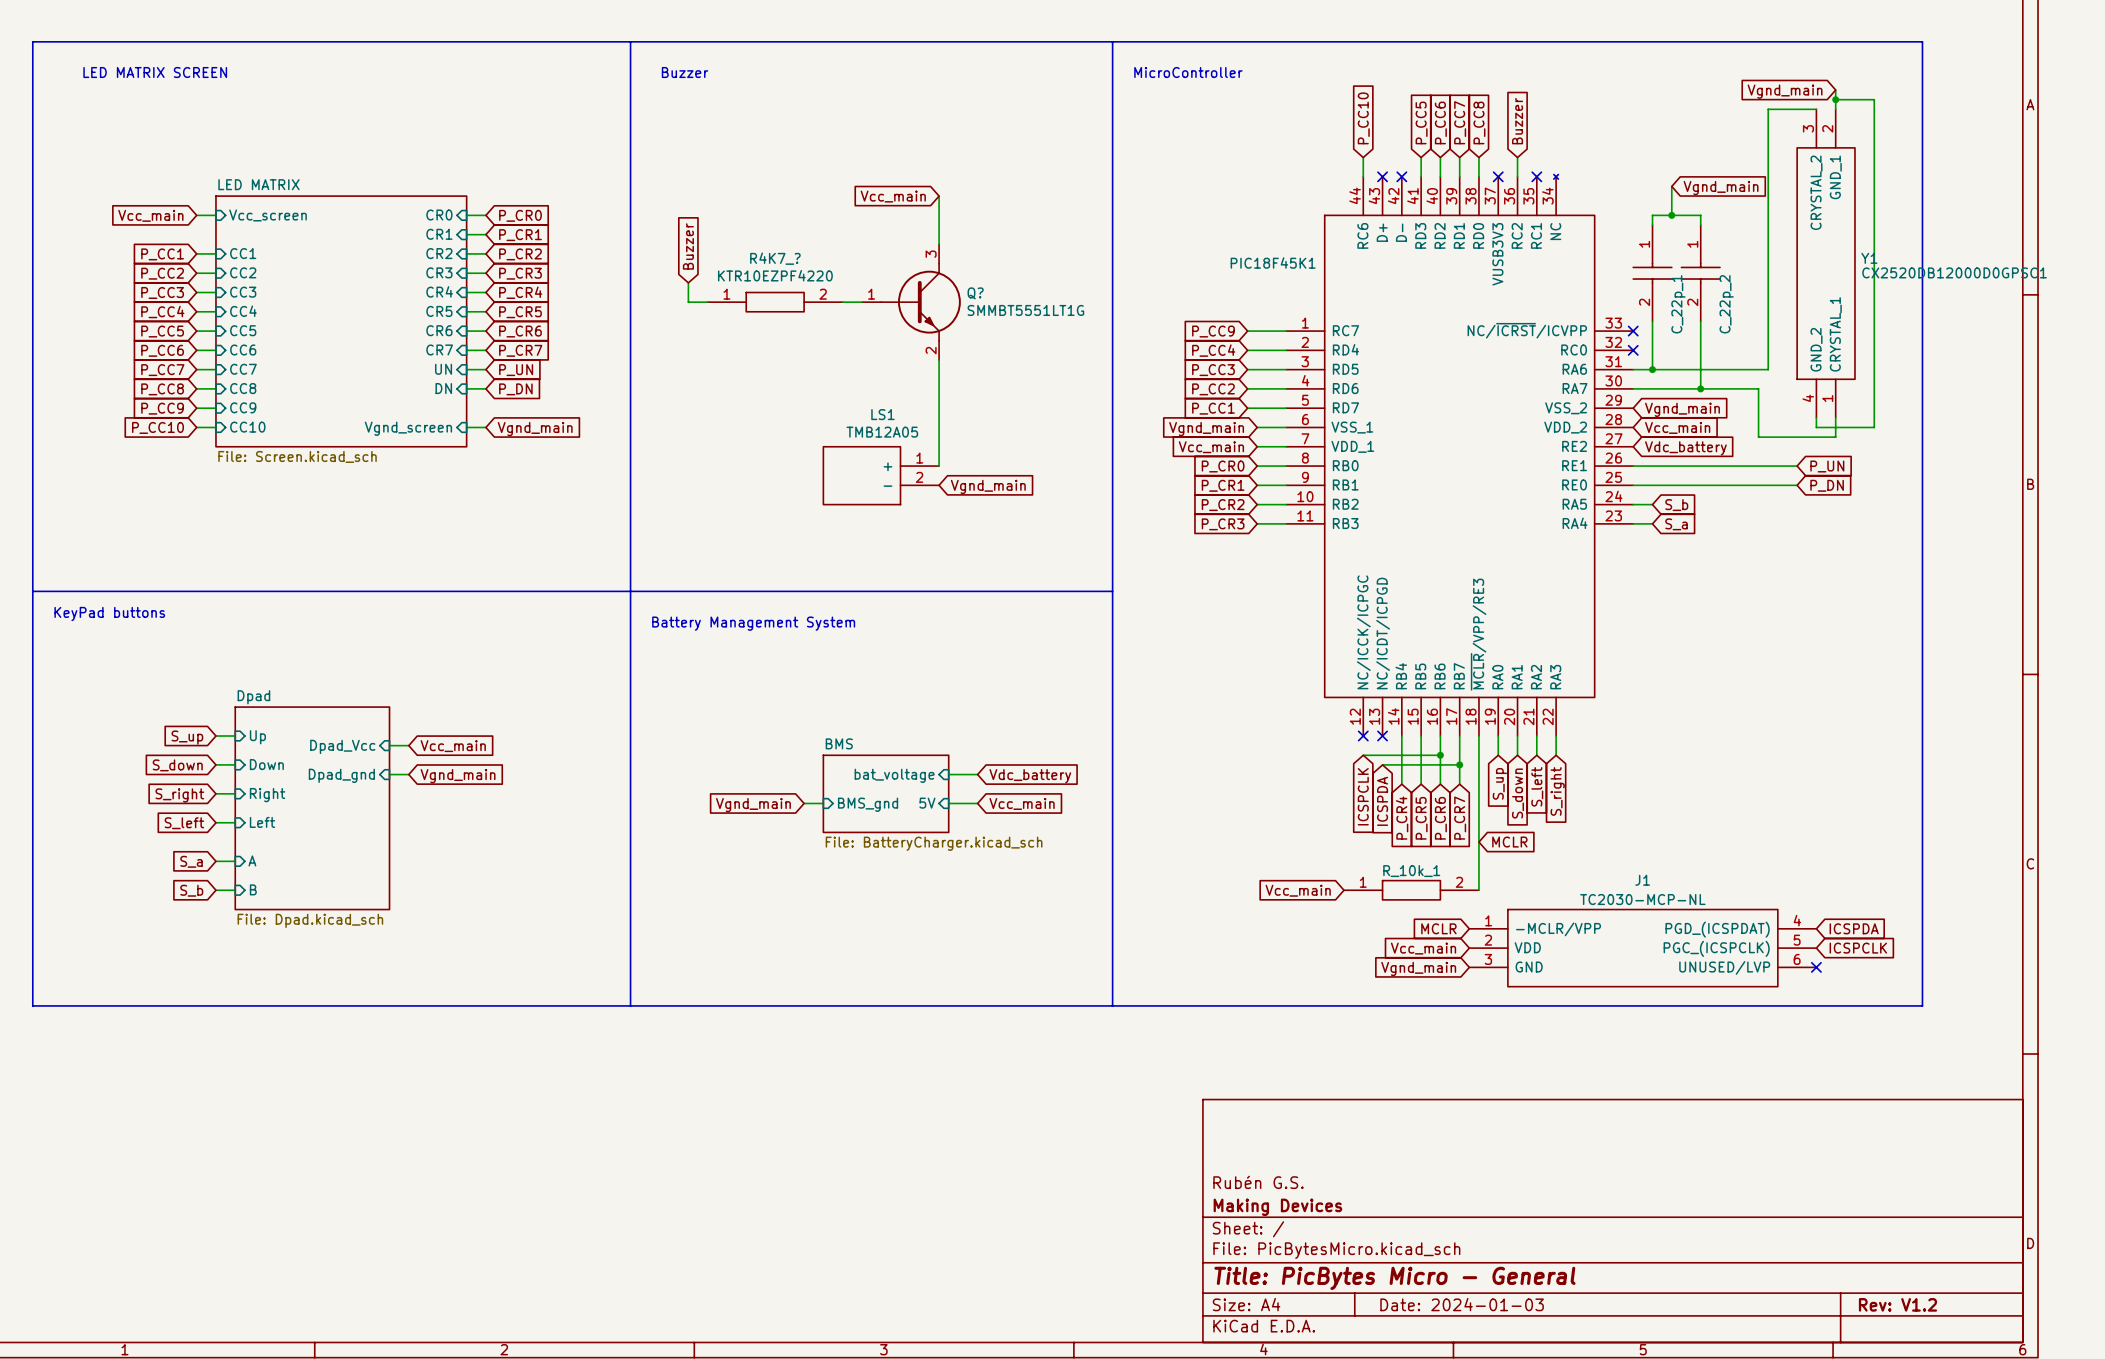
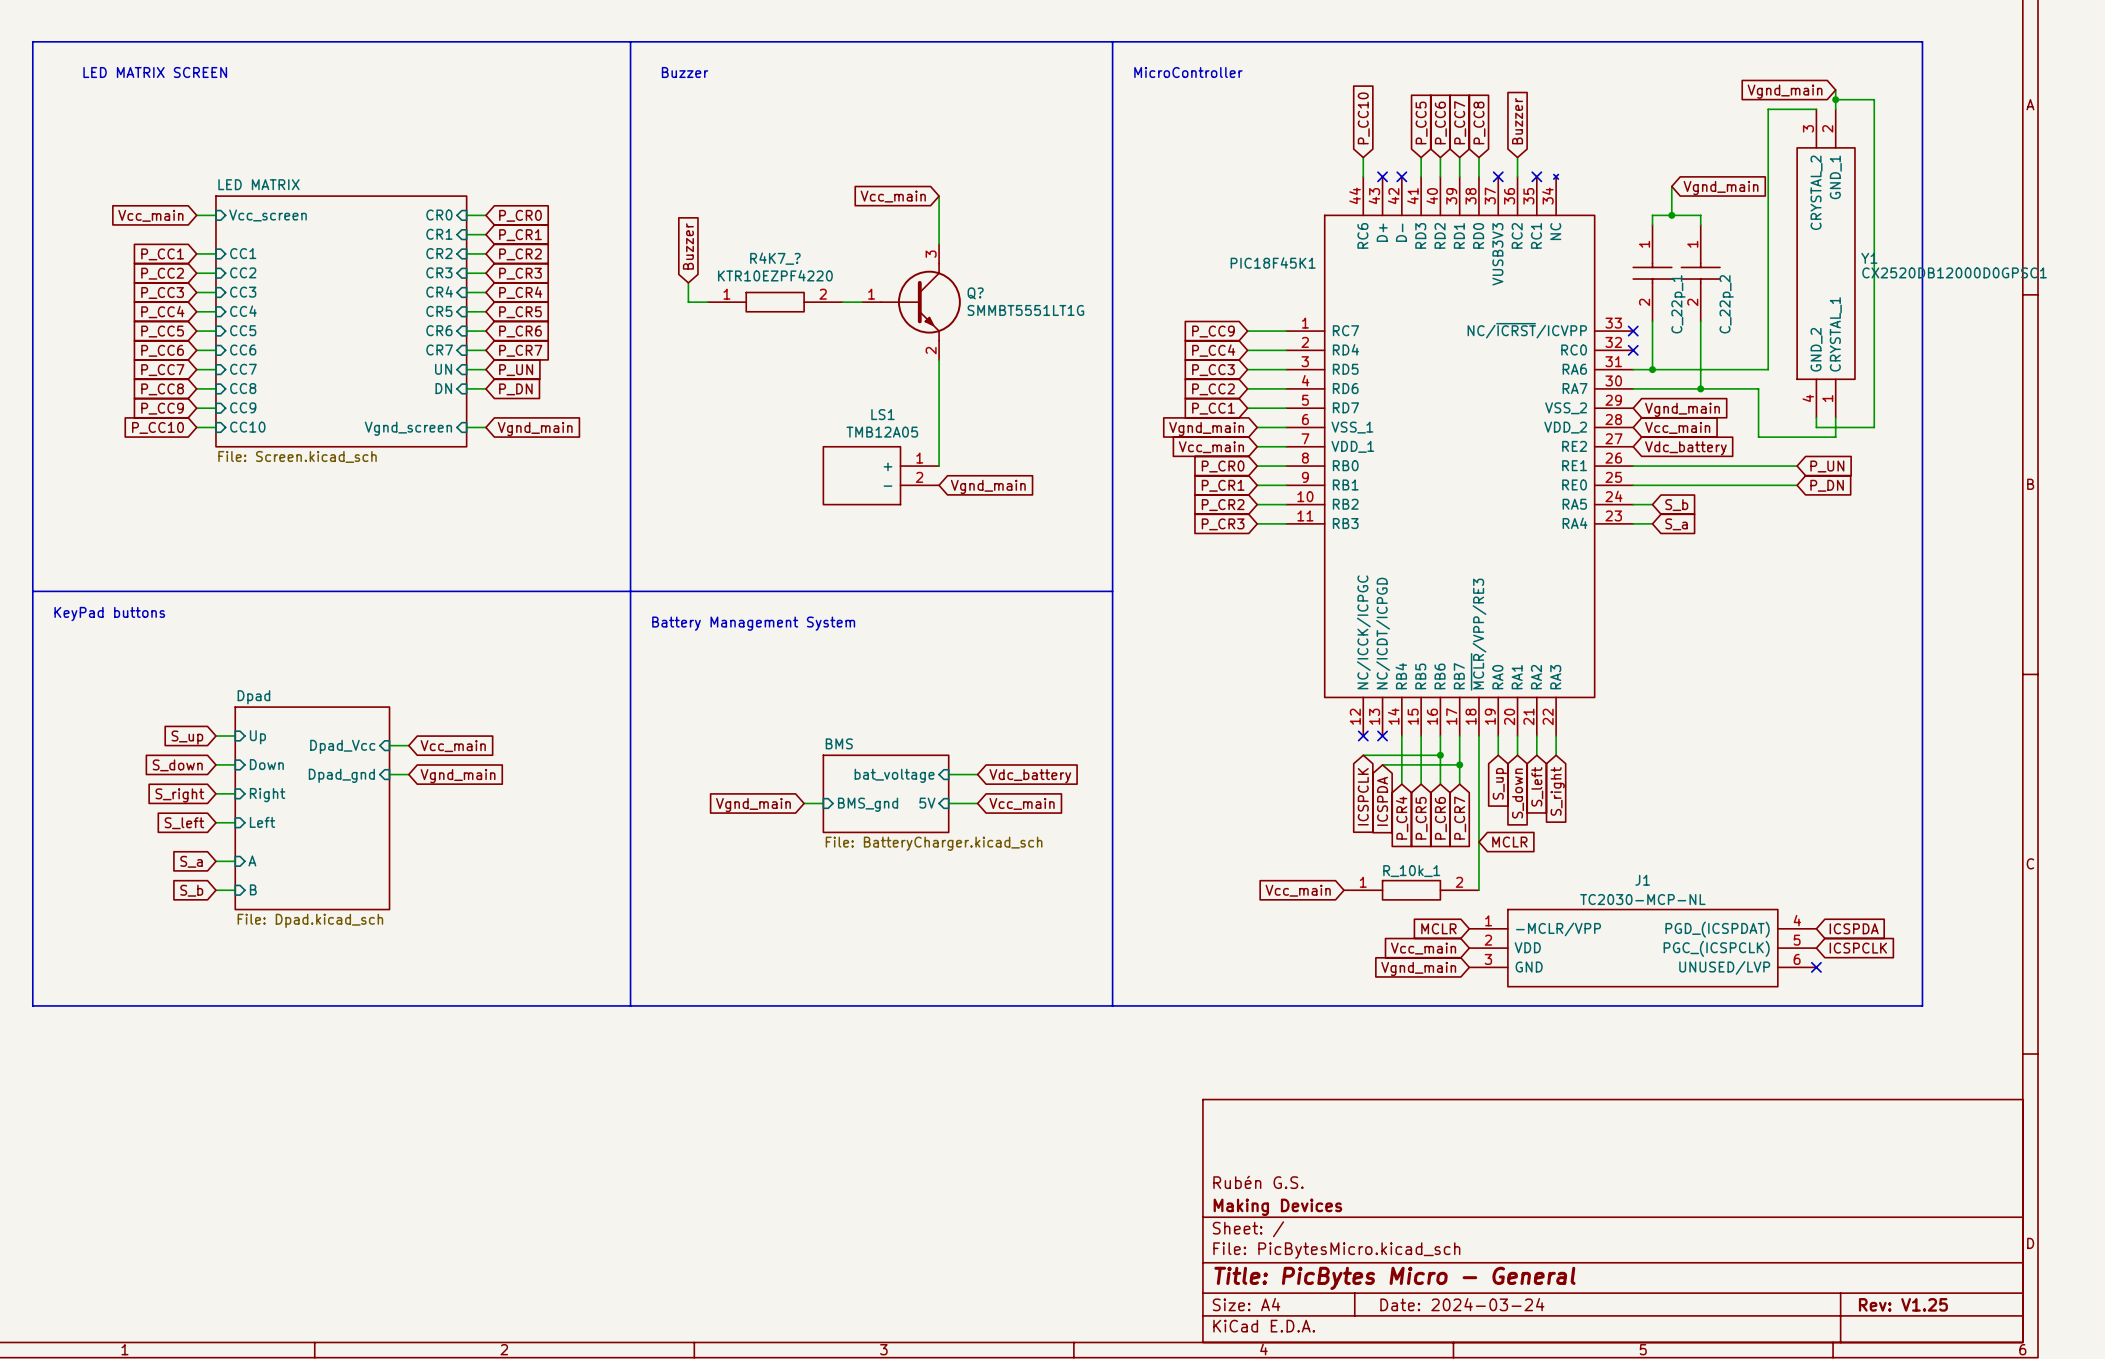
title block: Date: 2024-01-03 (1462, 1304) -> Date: 2024-03-24 (1462, 1304)
title block: Rev: V1.2 (1897, 1304) -> Rev: V1.25 (1903, 1304)

